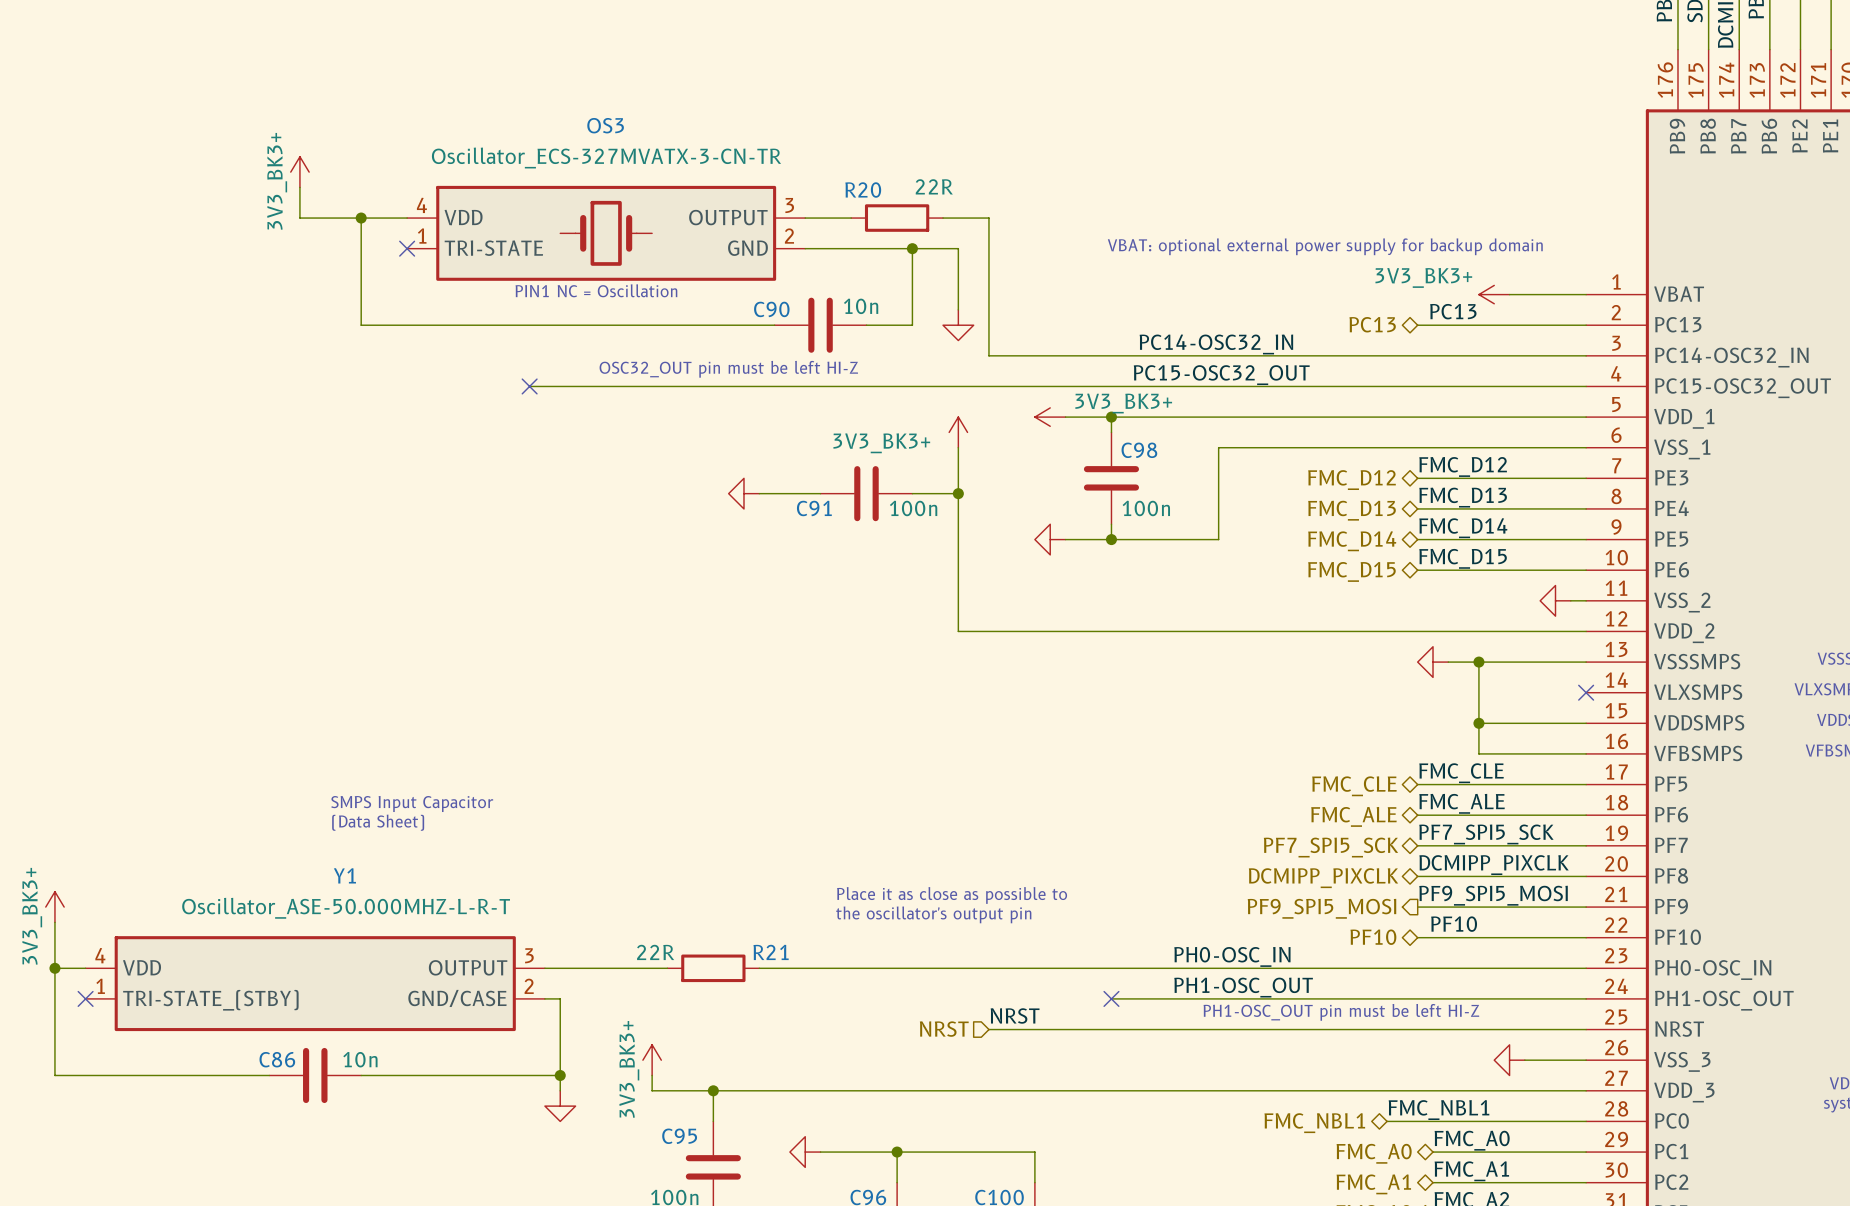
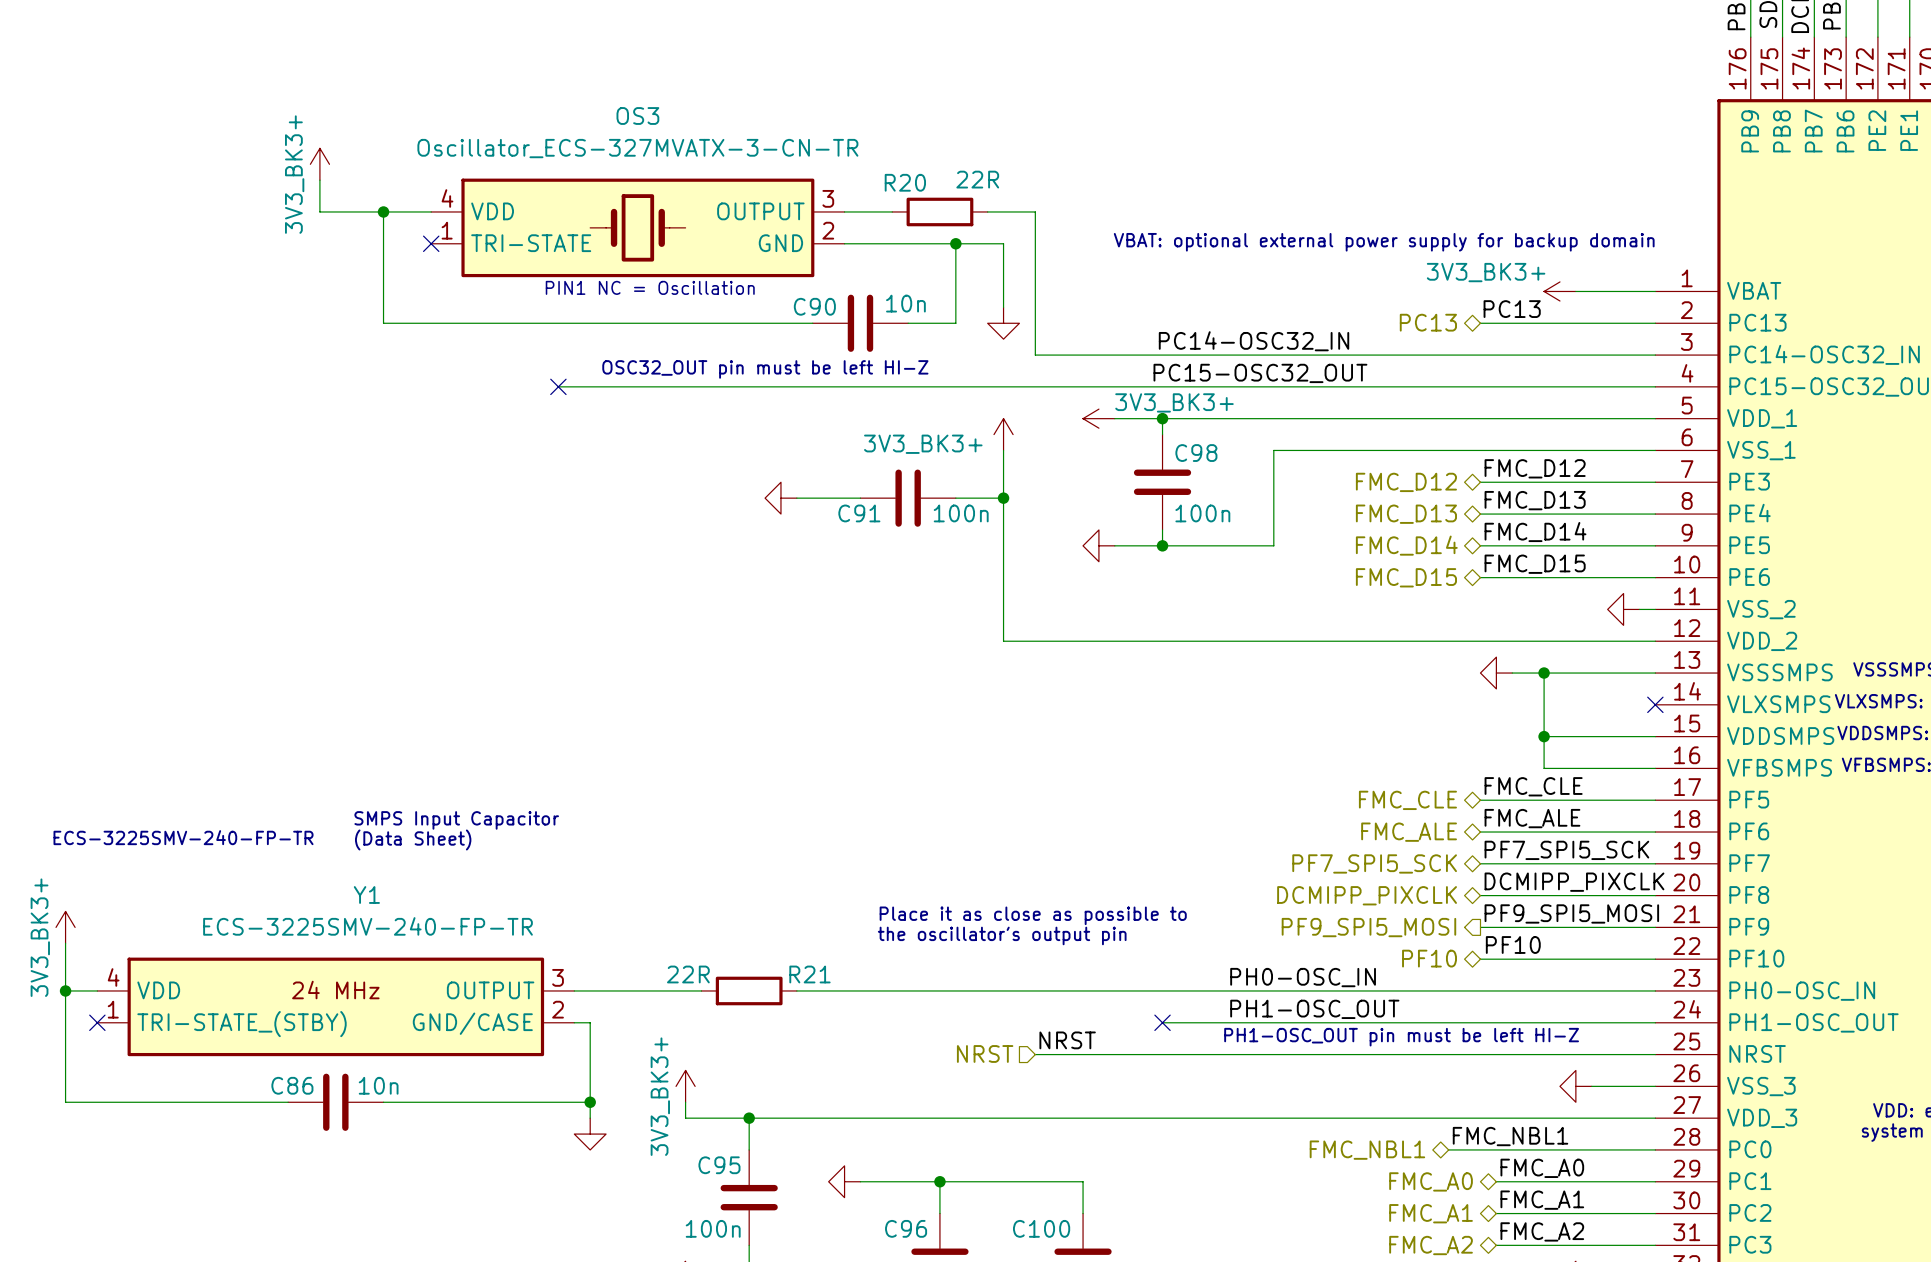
text: none -> ECS-3225SMV-240-FP-TR (183, 837)
Y1 value: Oscillator_ASE-50.000MHZ-L-R-T (346, 908) -> ECS-3225SMV-240-FP-TR (368, 926)
Y1 text: none -> 24 MHz (335, 990)

